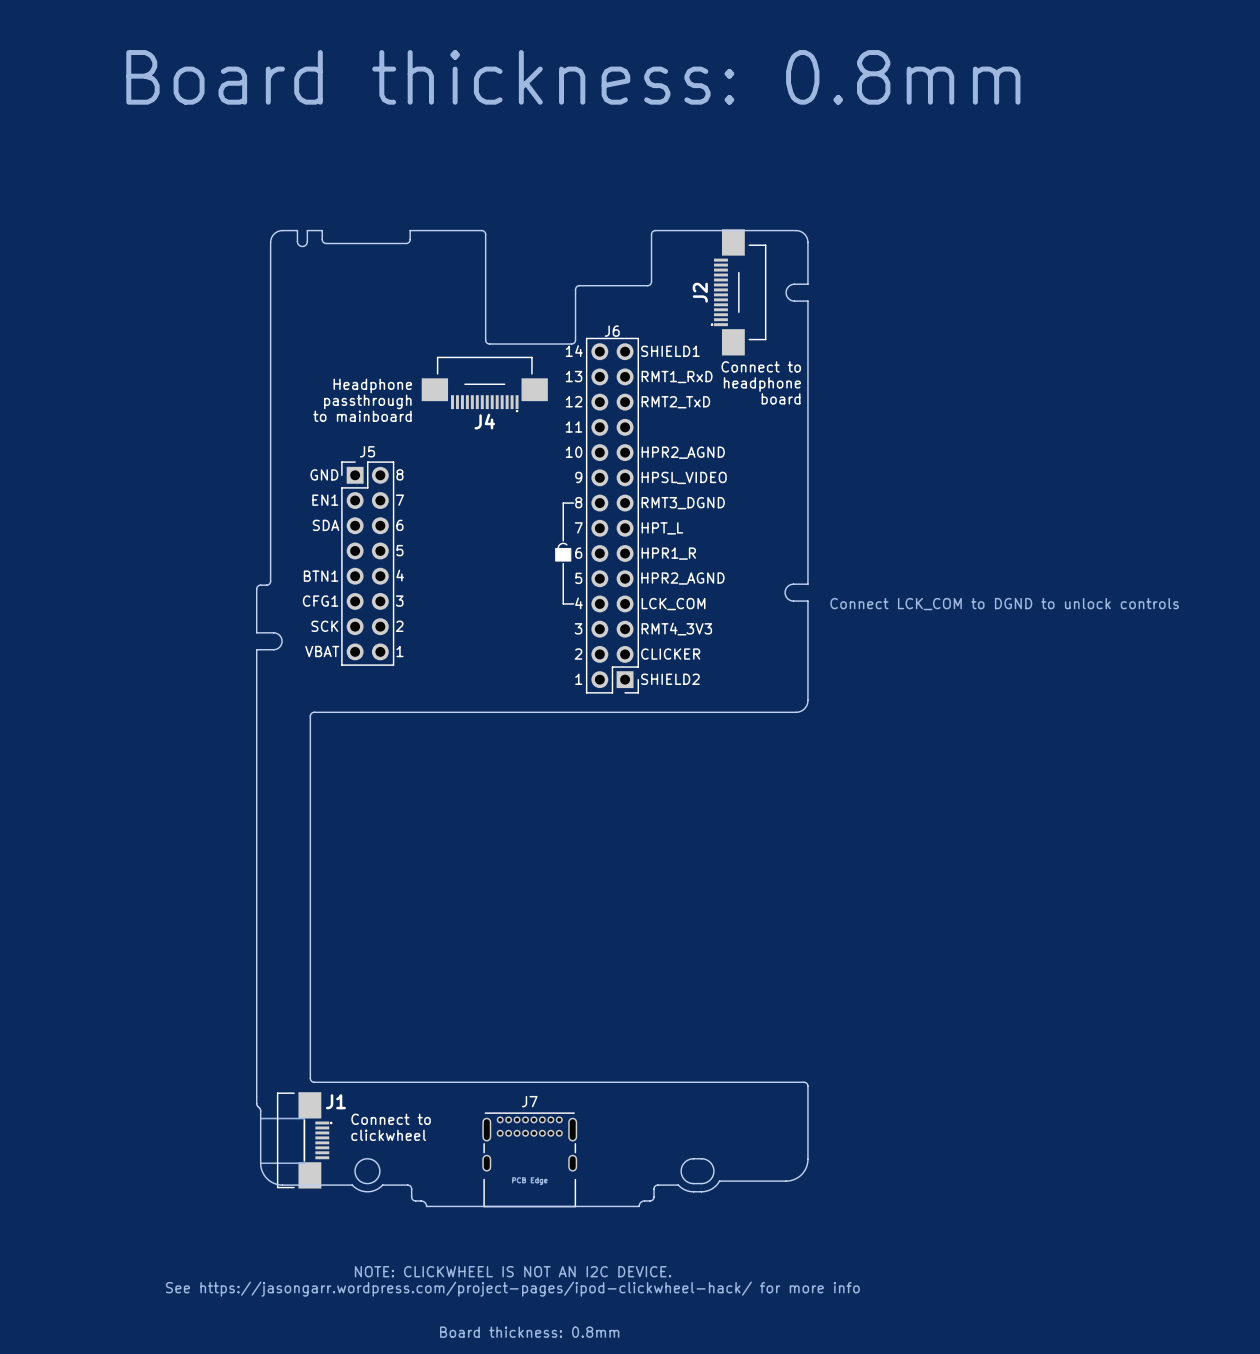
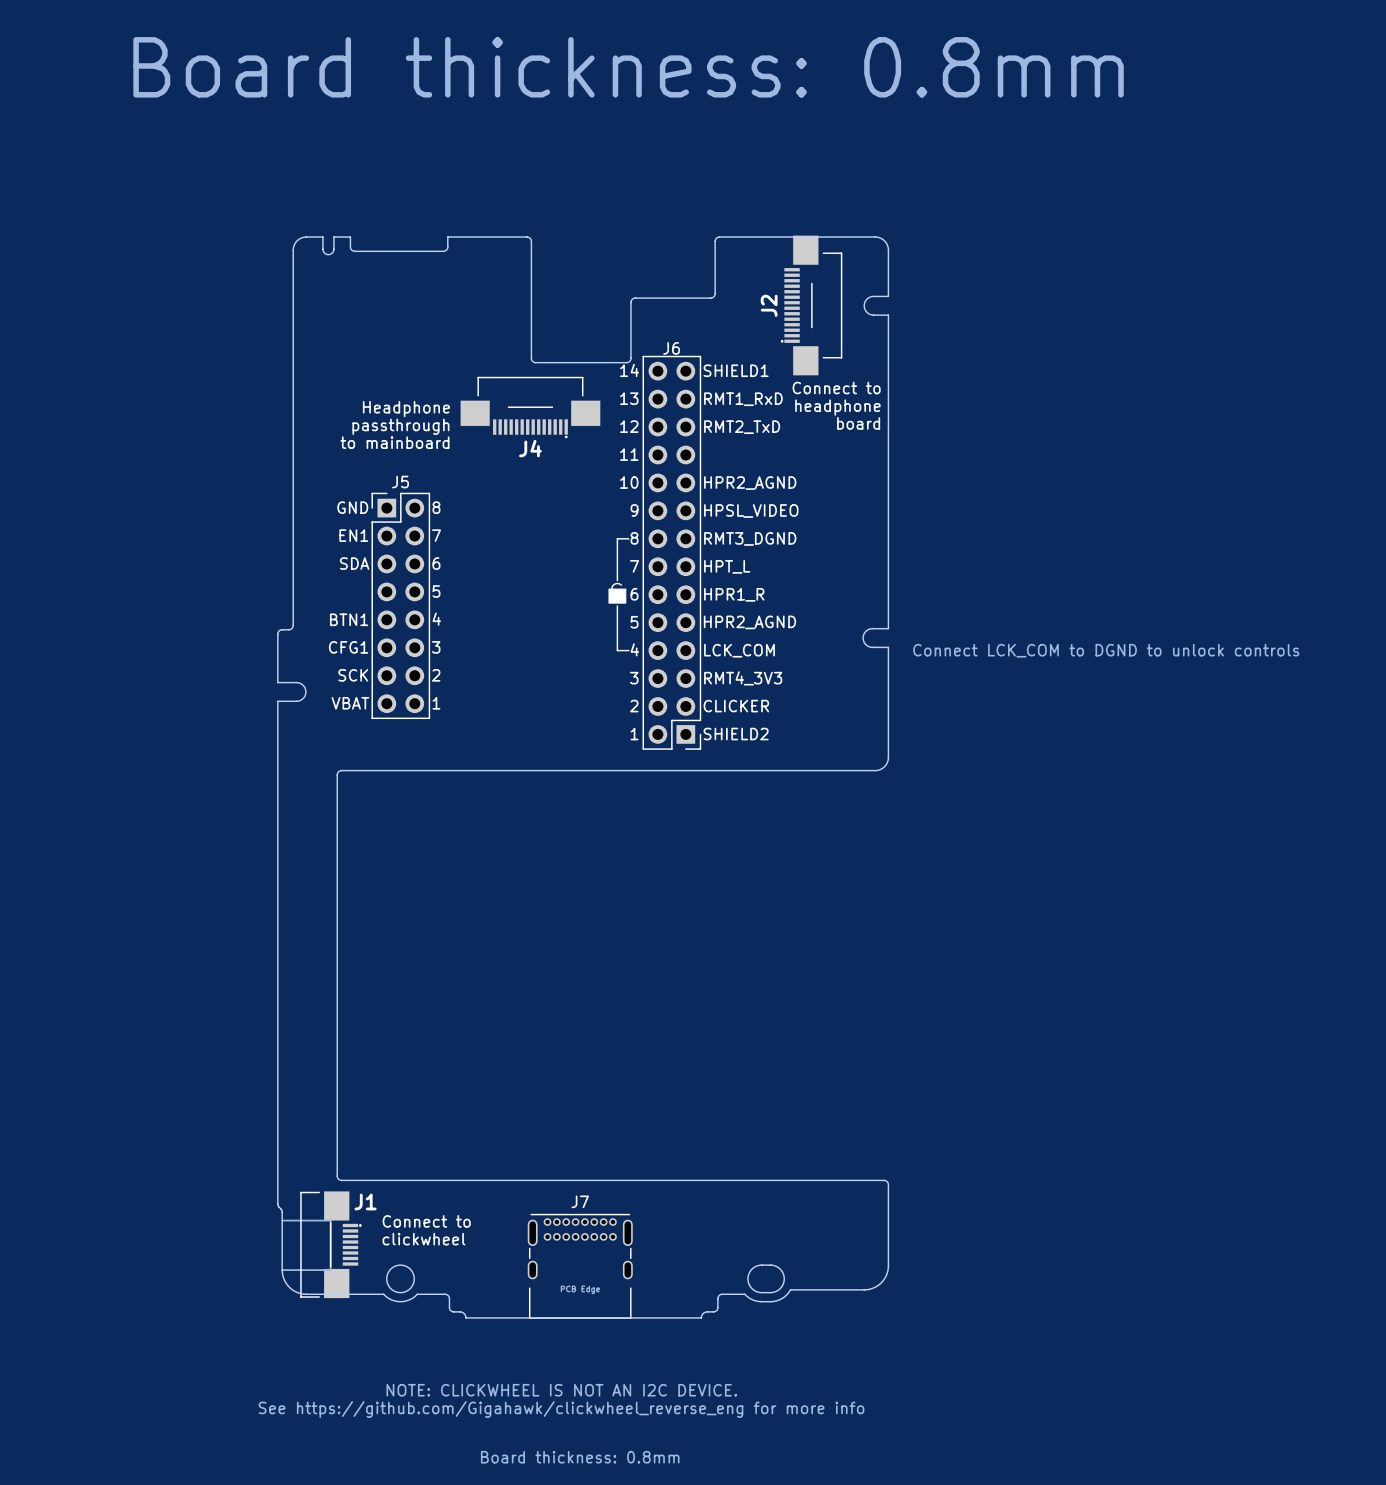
text: See https://jasongarr.wordpress.com/project-pages/ipod-clickwheel-hack/ for more info (512, 1289) -> See https://github.com/Gigahawk/clickwheel_reverse_eng for more info (561, 1409)

